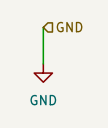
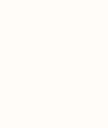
wire: (43, 27) (43, 63) -> none
hierarchical label: GND (69, 27) -> none
power symbol: GND (43, 73) -> none

